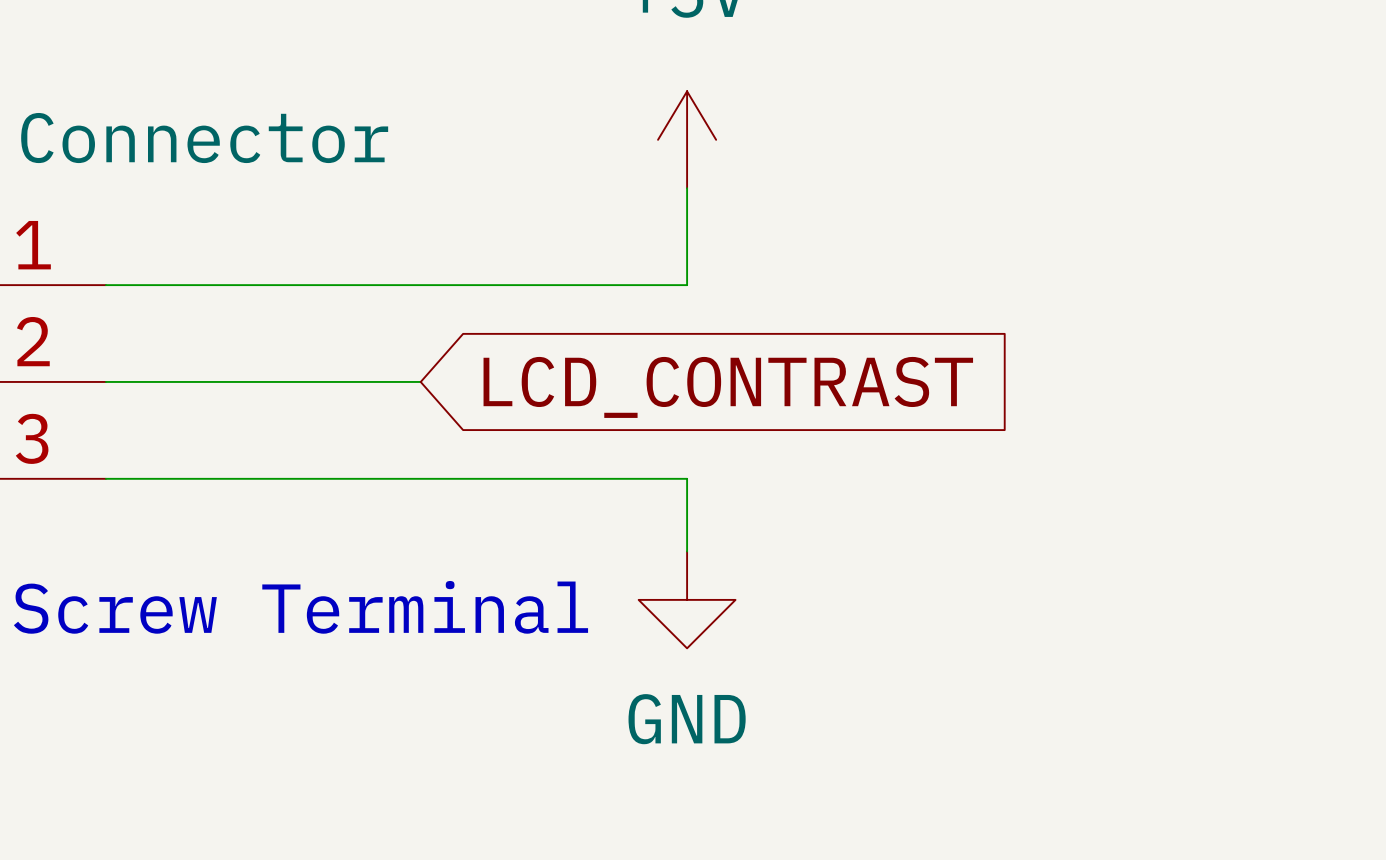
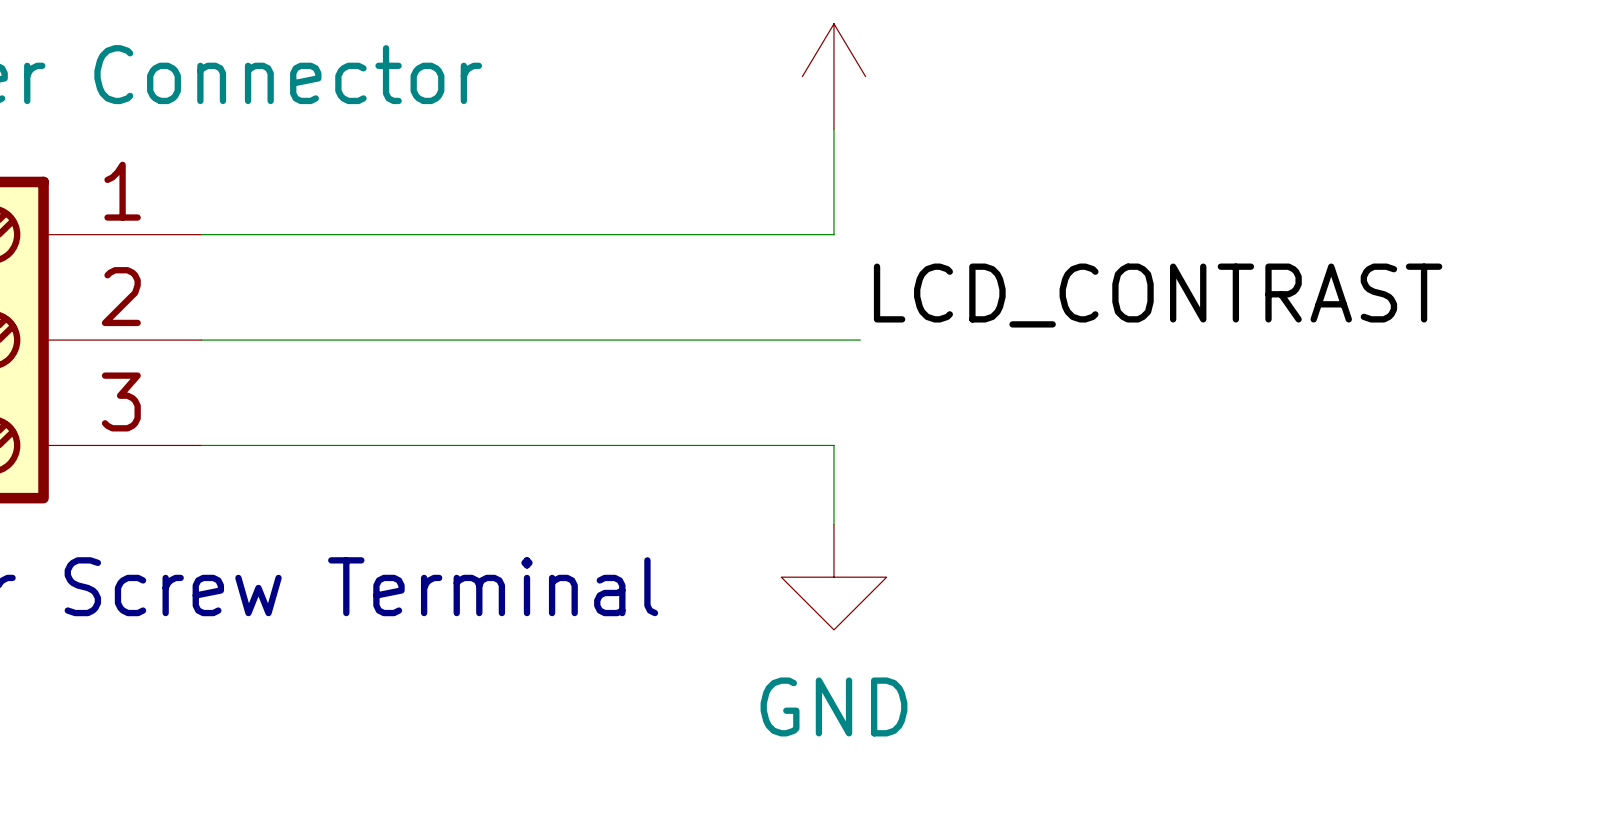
label: none -> LCD_CONTRAST (1158, 295)
wire: none -> (544, 340) (860, 340)
global label: LCD_CONTRAST (728, 387) -> none

